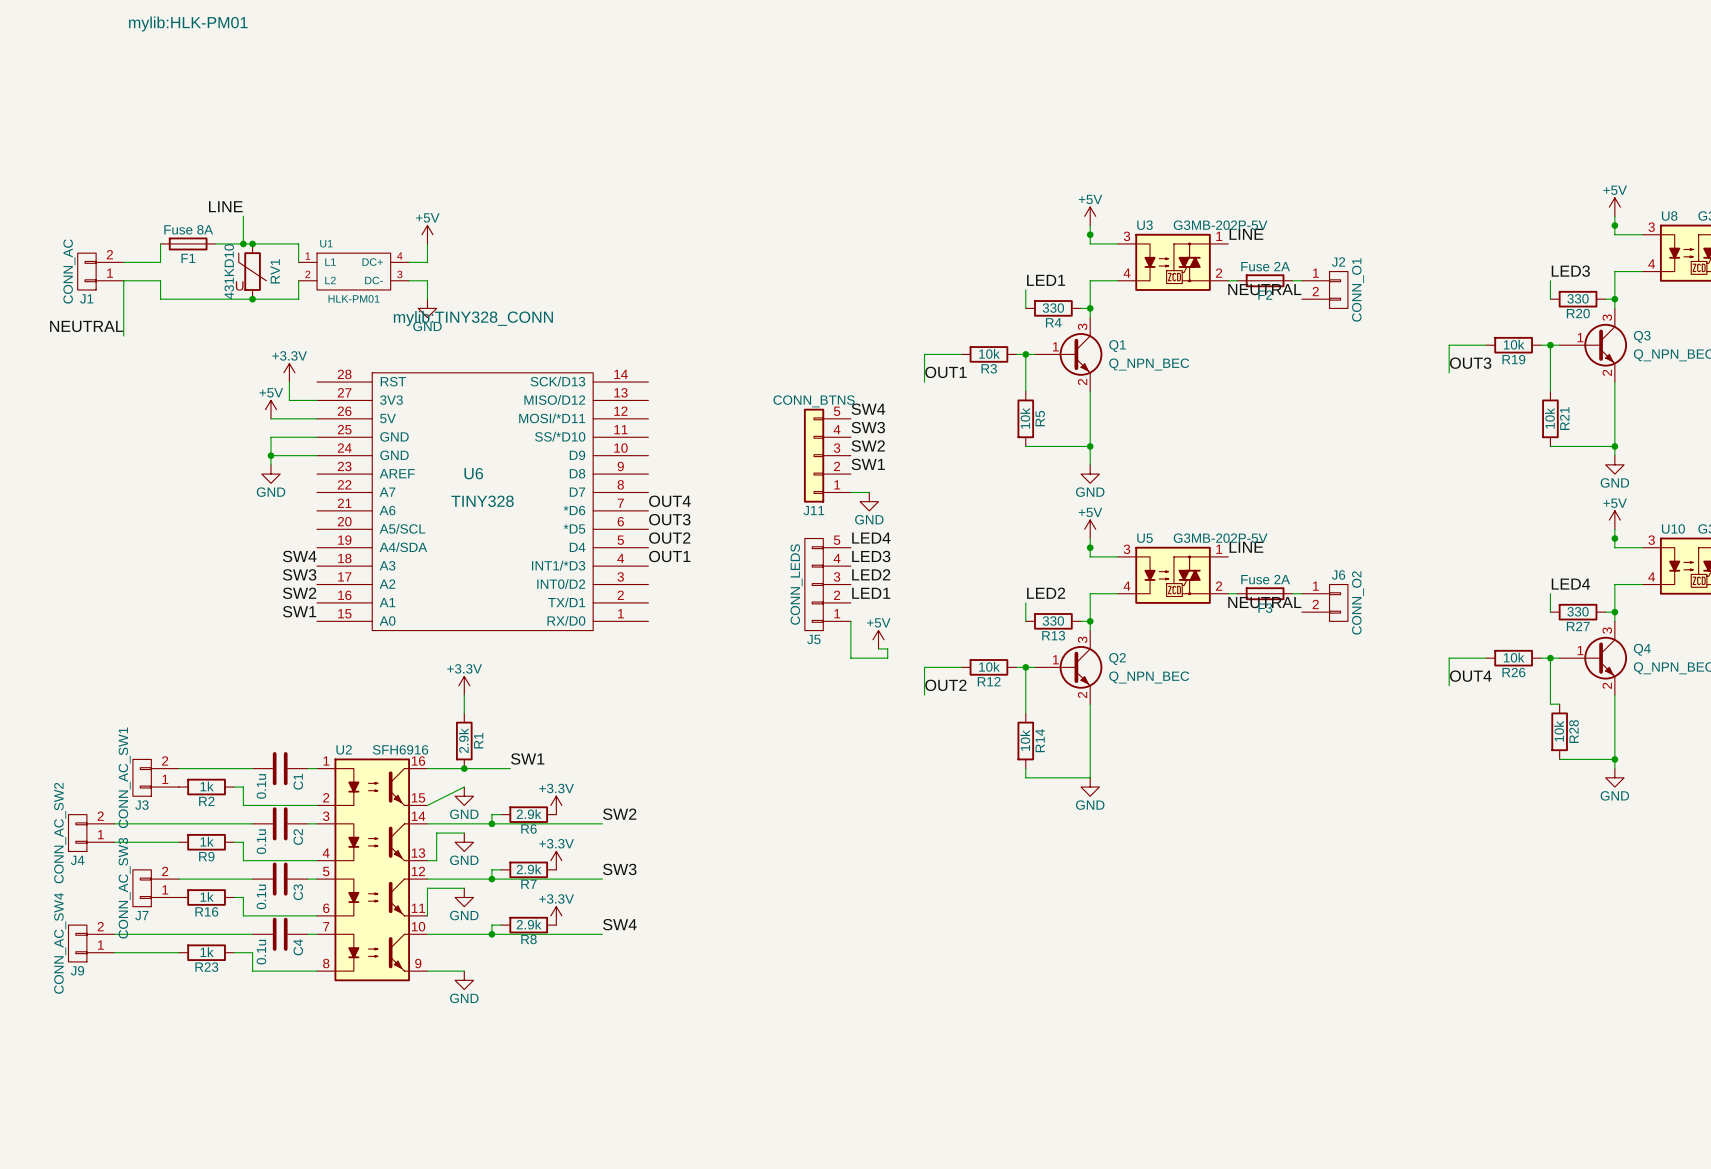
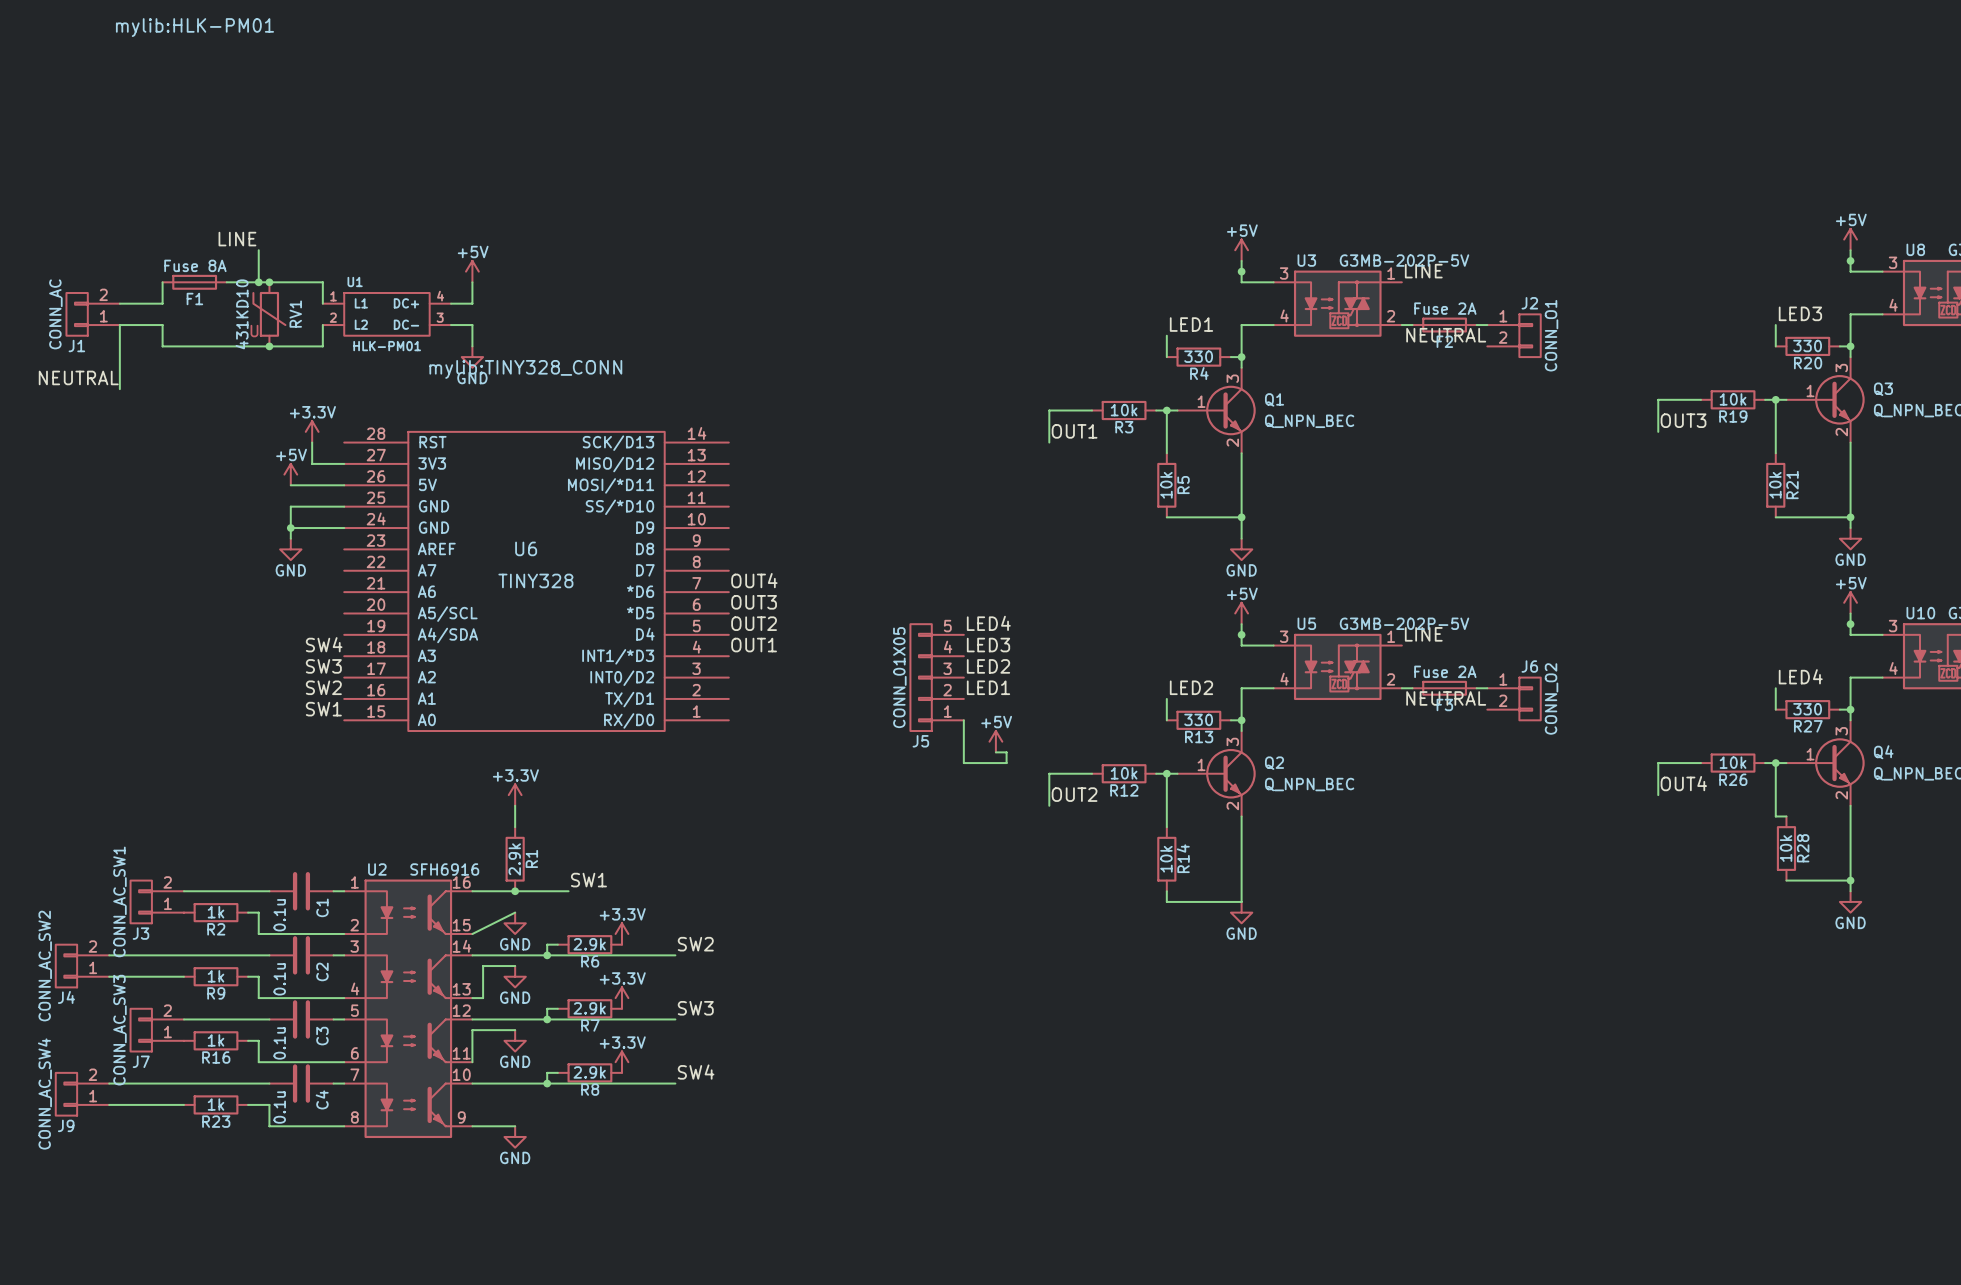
label: SW4 (868, 409) -> none
label: SW3 (868, 427) -> none
label: SW2 (868, 446) -> none
J11: CONN_BTNS (827, 455) -> none
label: SW1 (868, 464) -> none
wire: (850, 492) (869, 492) -> none
power symbol: GND (869, 501) -> none
J5 value: CONN_LEDS (796, 584) -> CONN_01X05 (899, 677)

